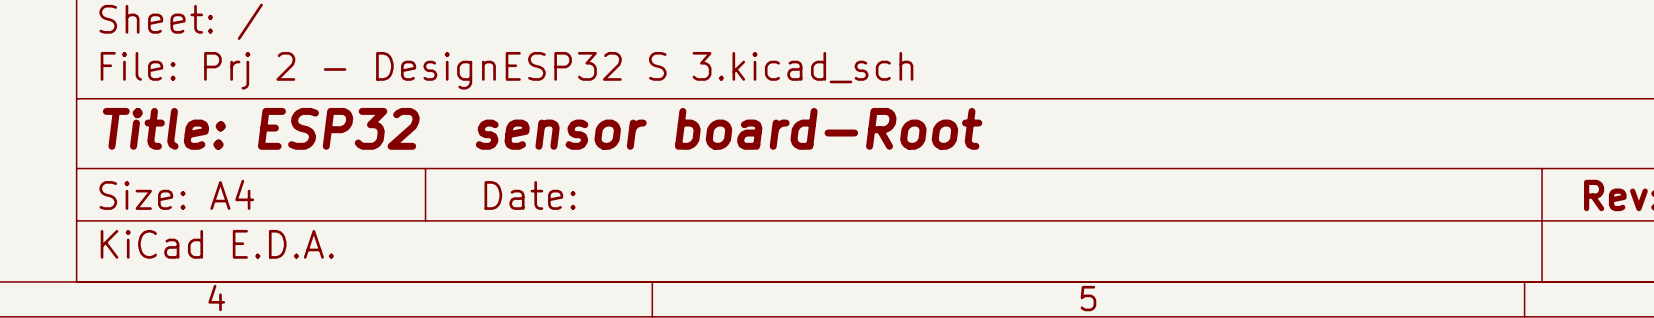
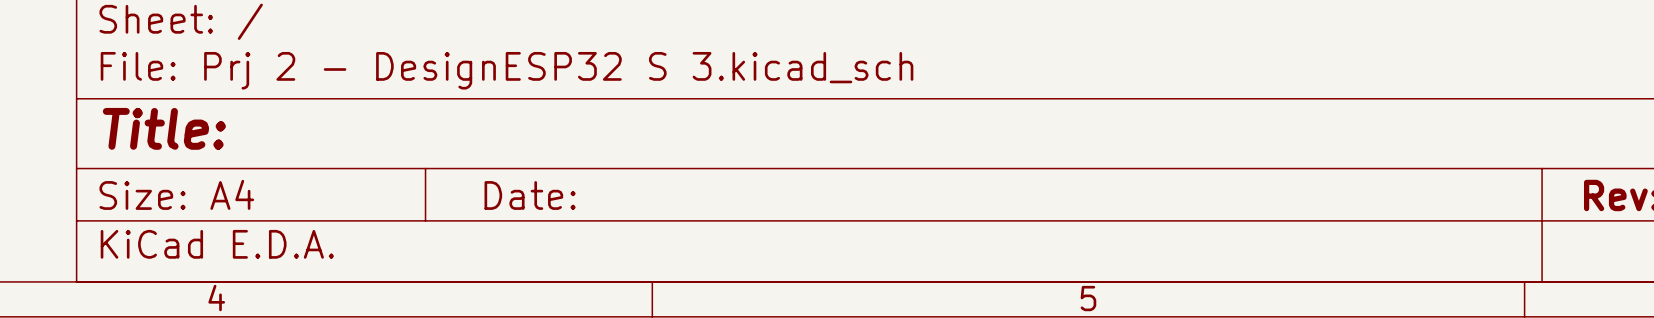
title block: Title: ESP32 sensor board-Root (542, 128) -> Title: (164, 128)

